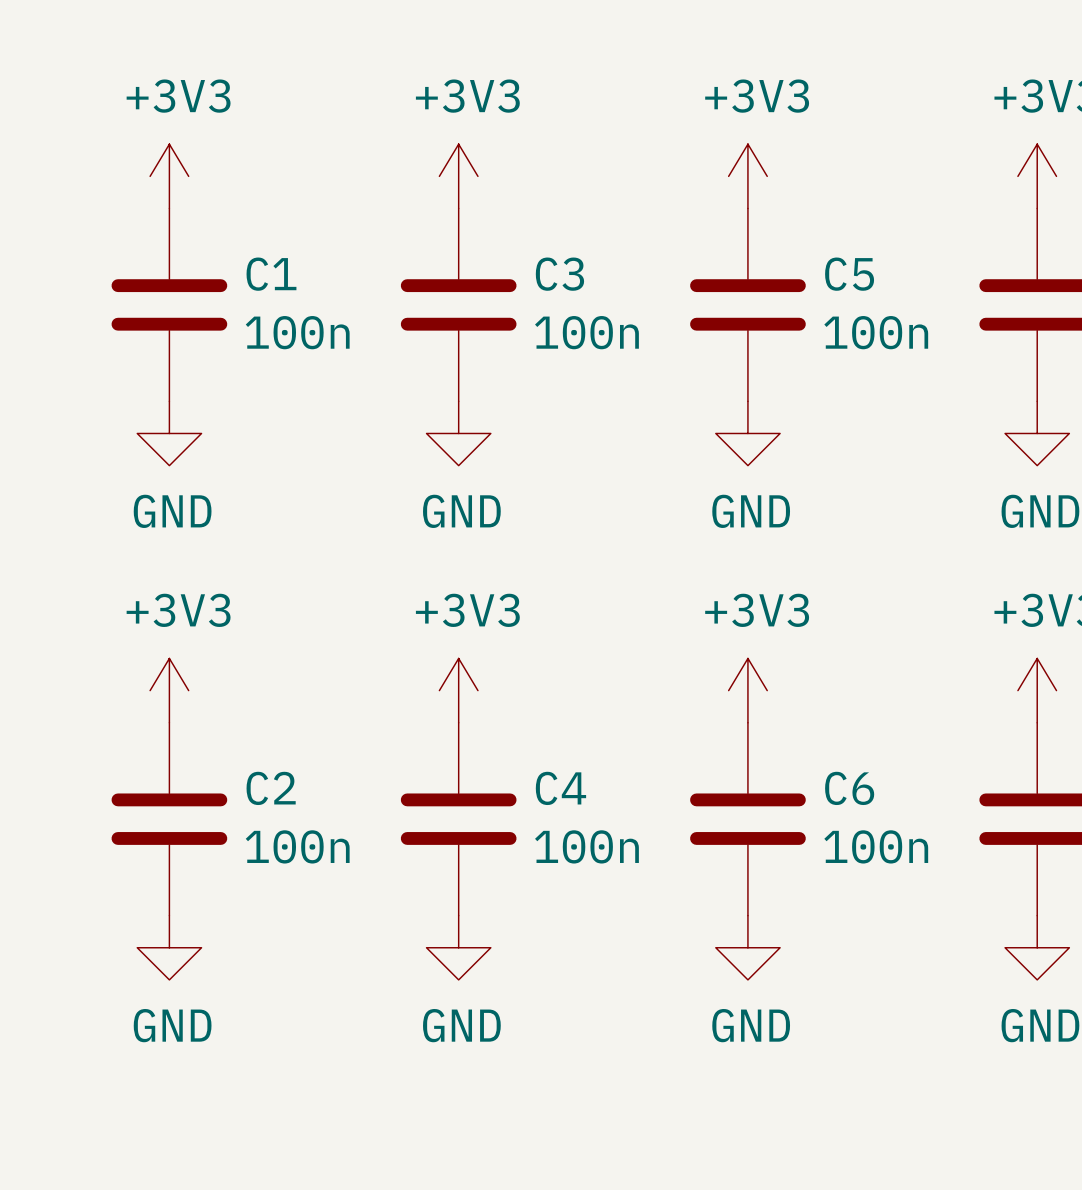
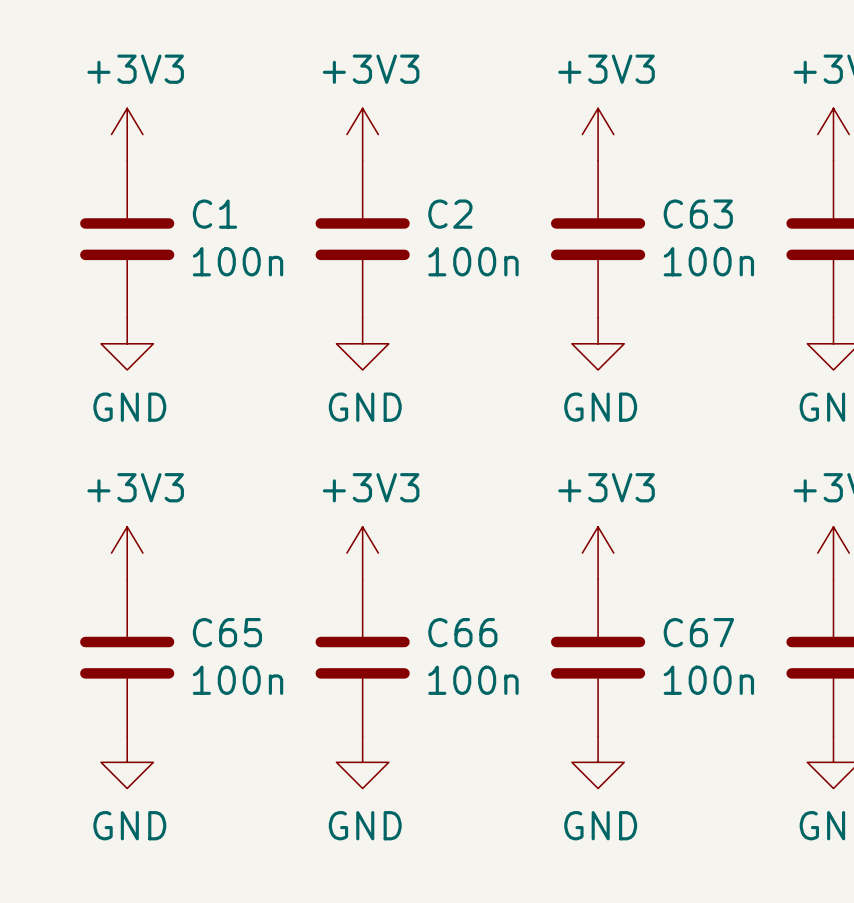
C3 name: C3 (559, 274) -> C2 (450, 214)
C5 name: C5 (849, 274) -> C63 (698, 214)
C2 name: C2 (271, 788) -> C65 (227, 632)
C4 name: C4 (560, 788) -> C66 (462, 632)
C6 name: C6 (849, 788) -> C67 (698, 632)

